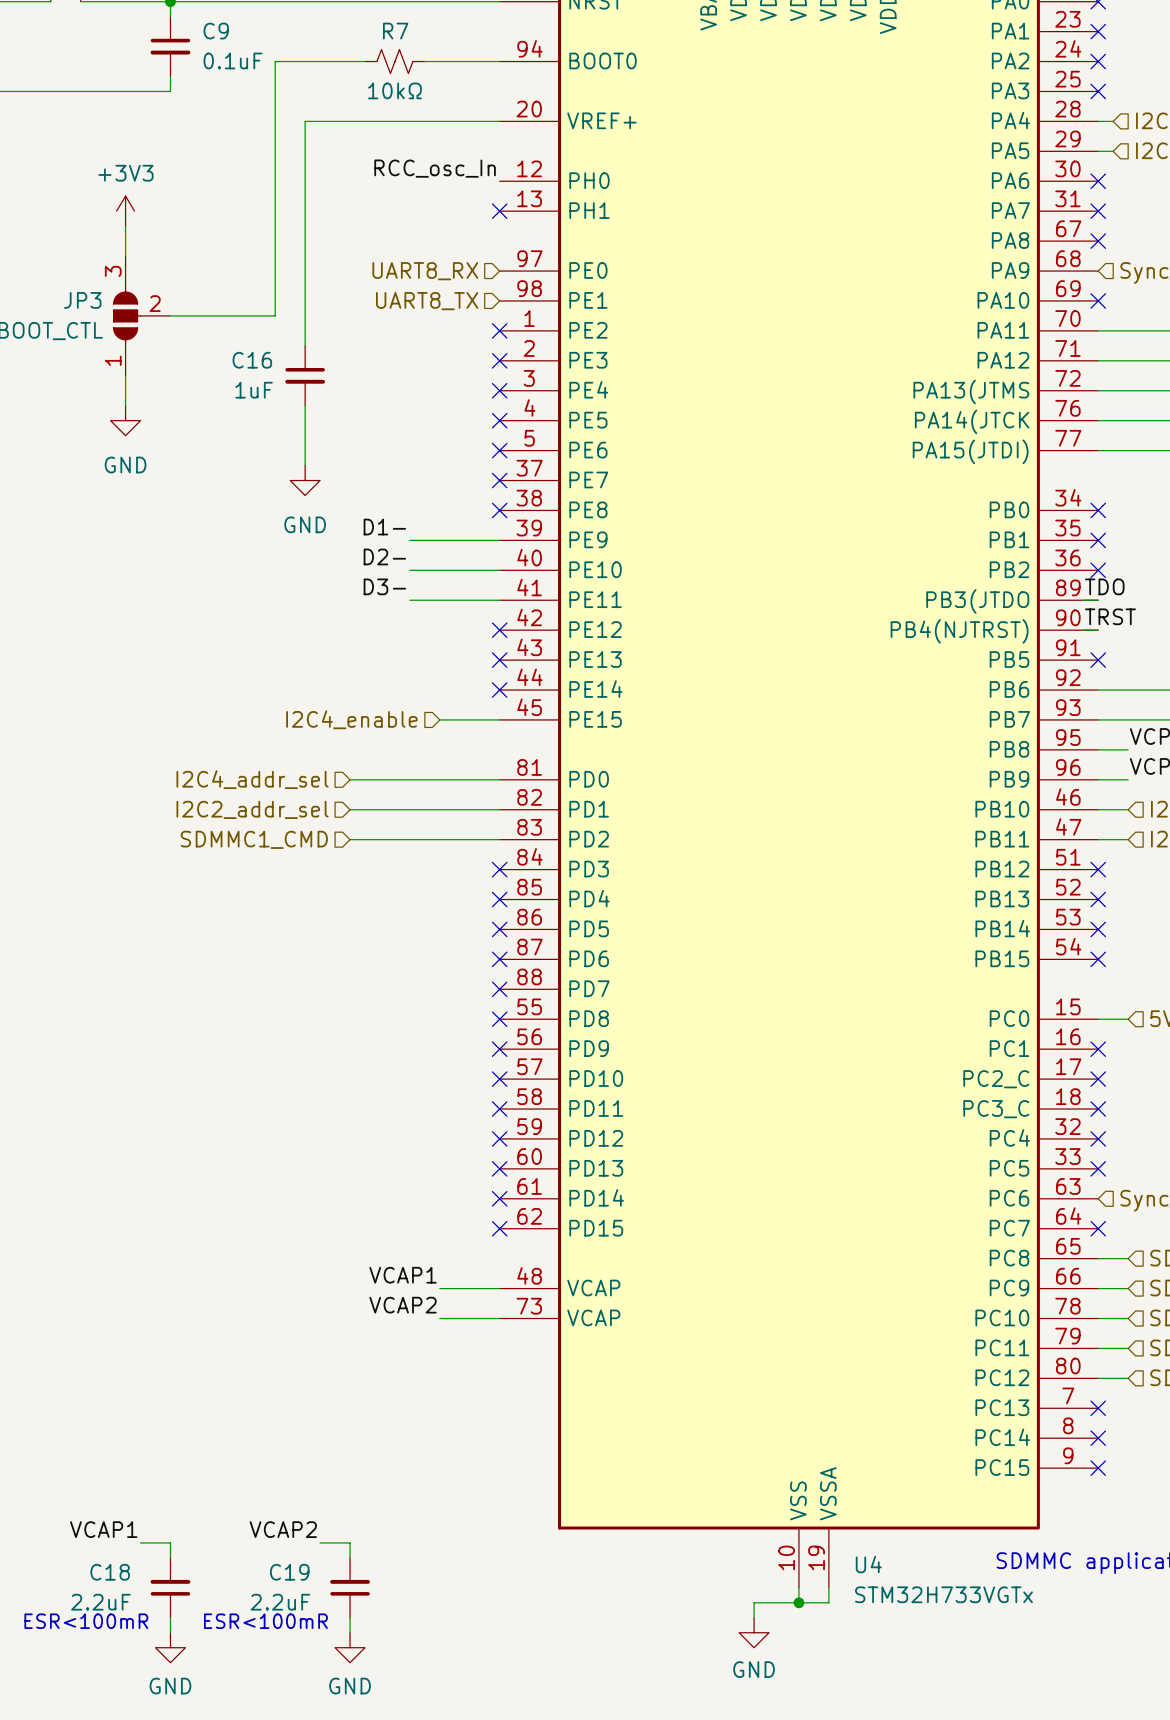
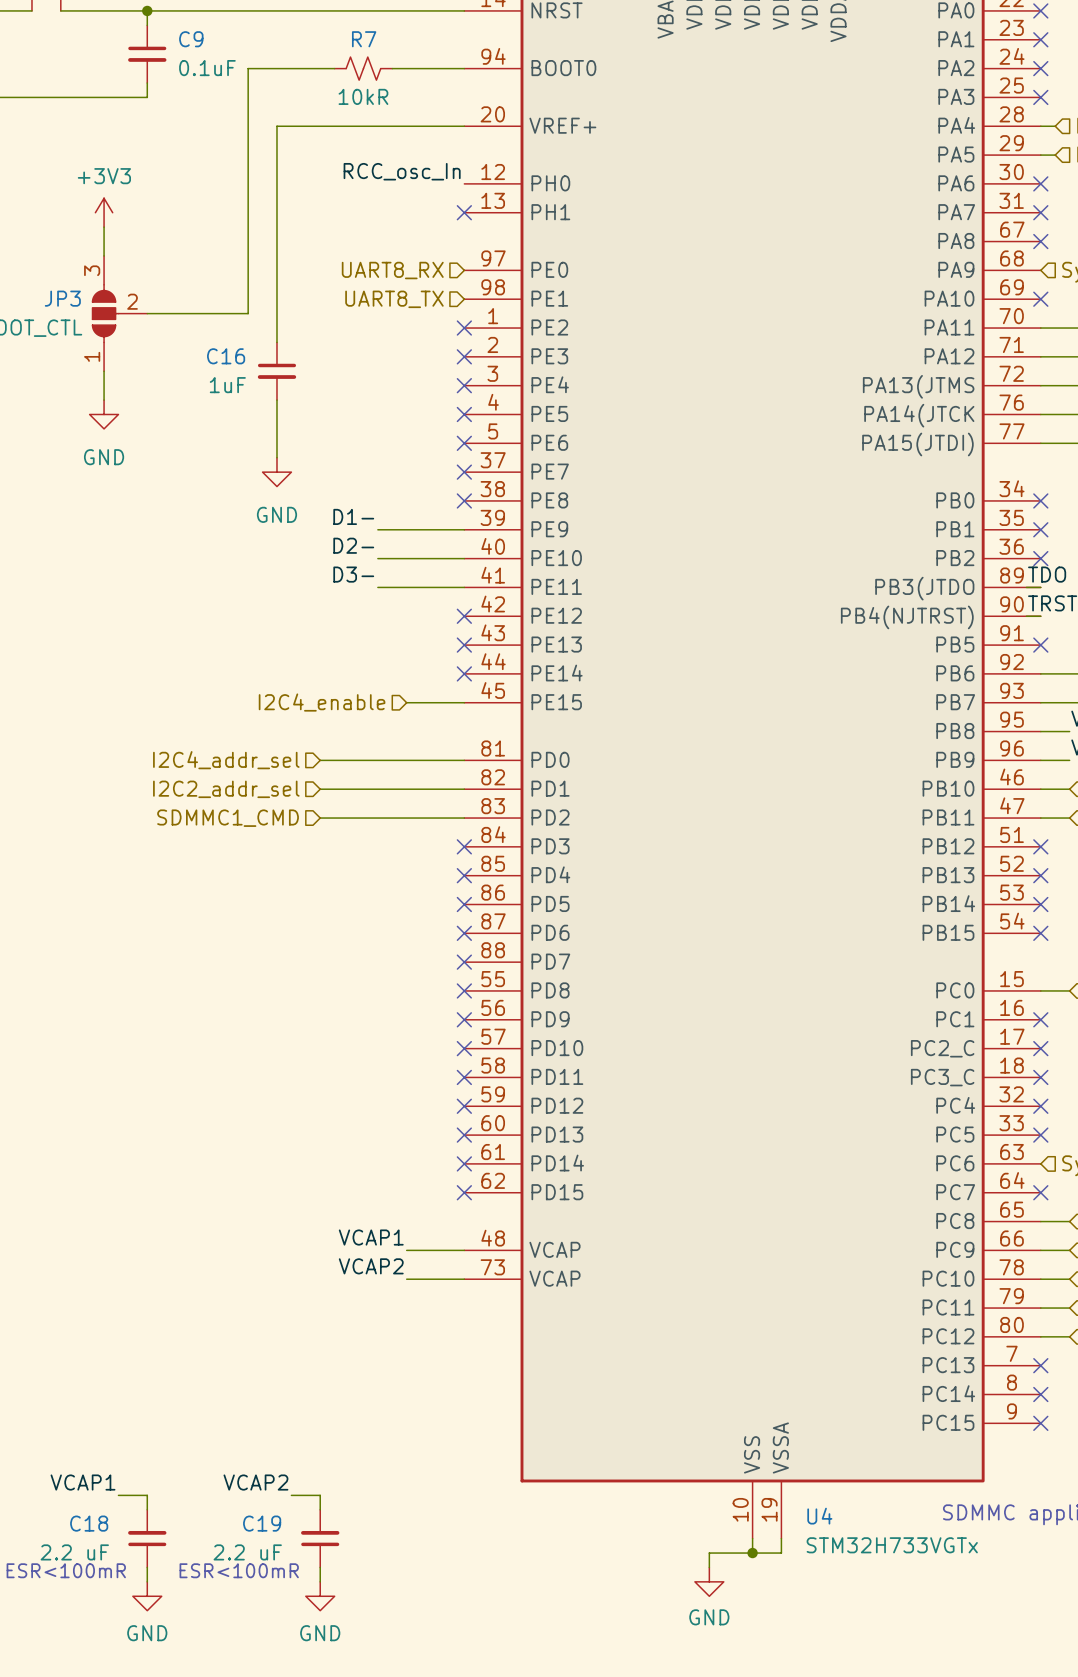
R7 value: 10kΩ (394, 90) -> 10kR (363, 96)
C18 value: 2.2uF (100, 1602) -> 2.2 uF (74, 1552)
C19 value: 2.2uF (280, 1602) -> 2.2 uF (247, 1552)

